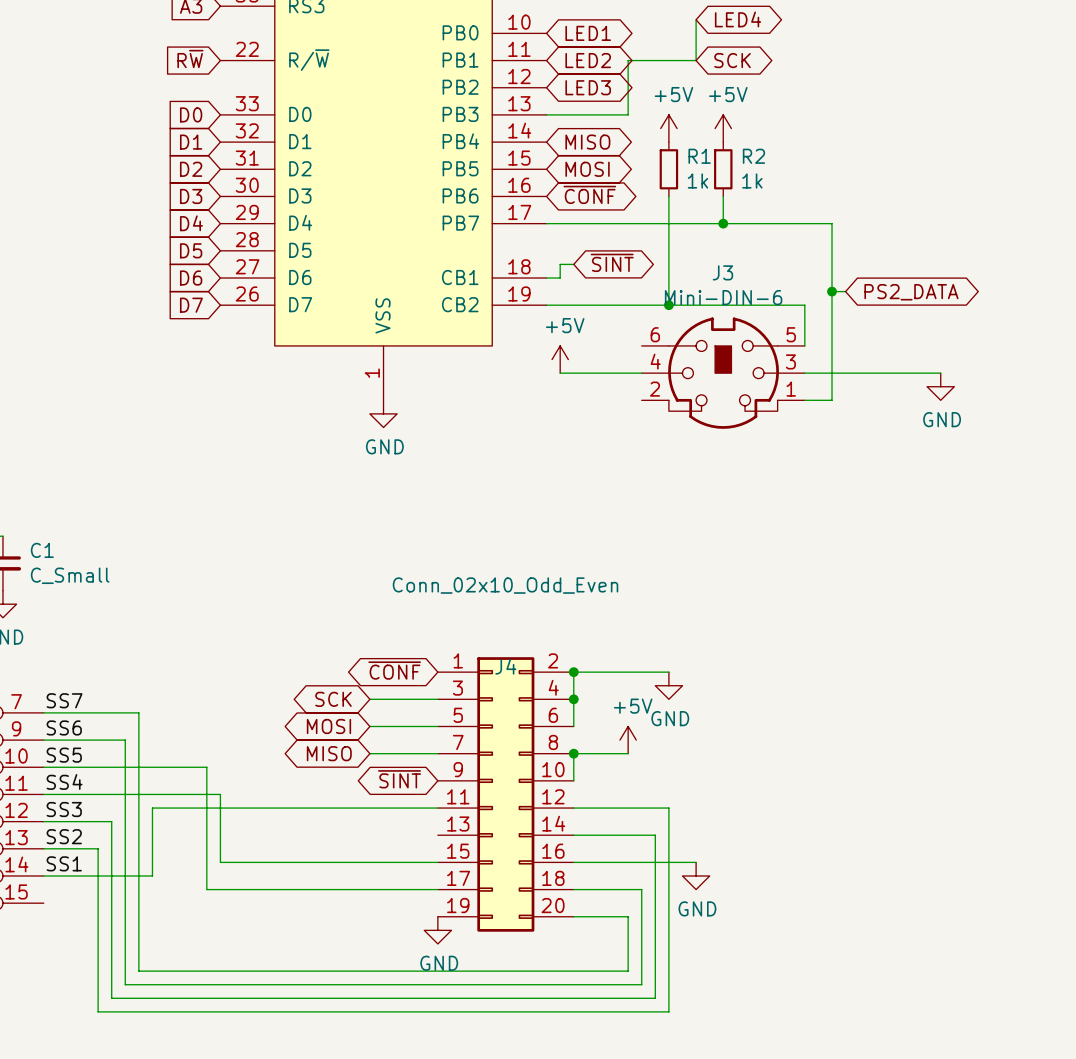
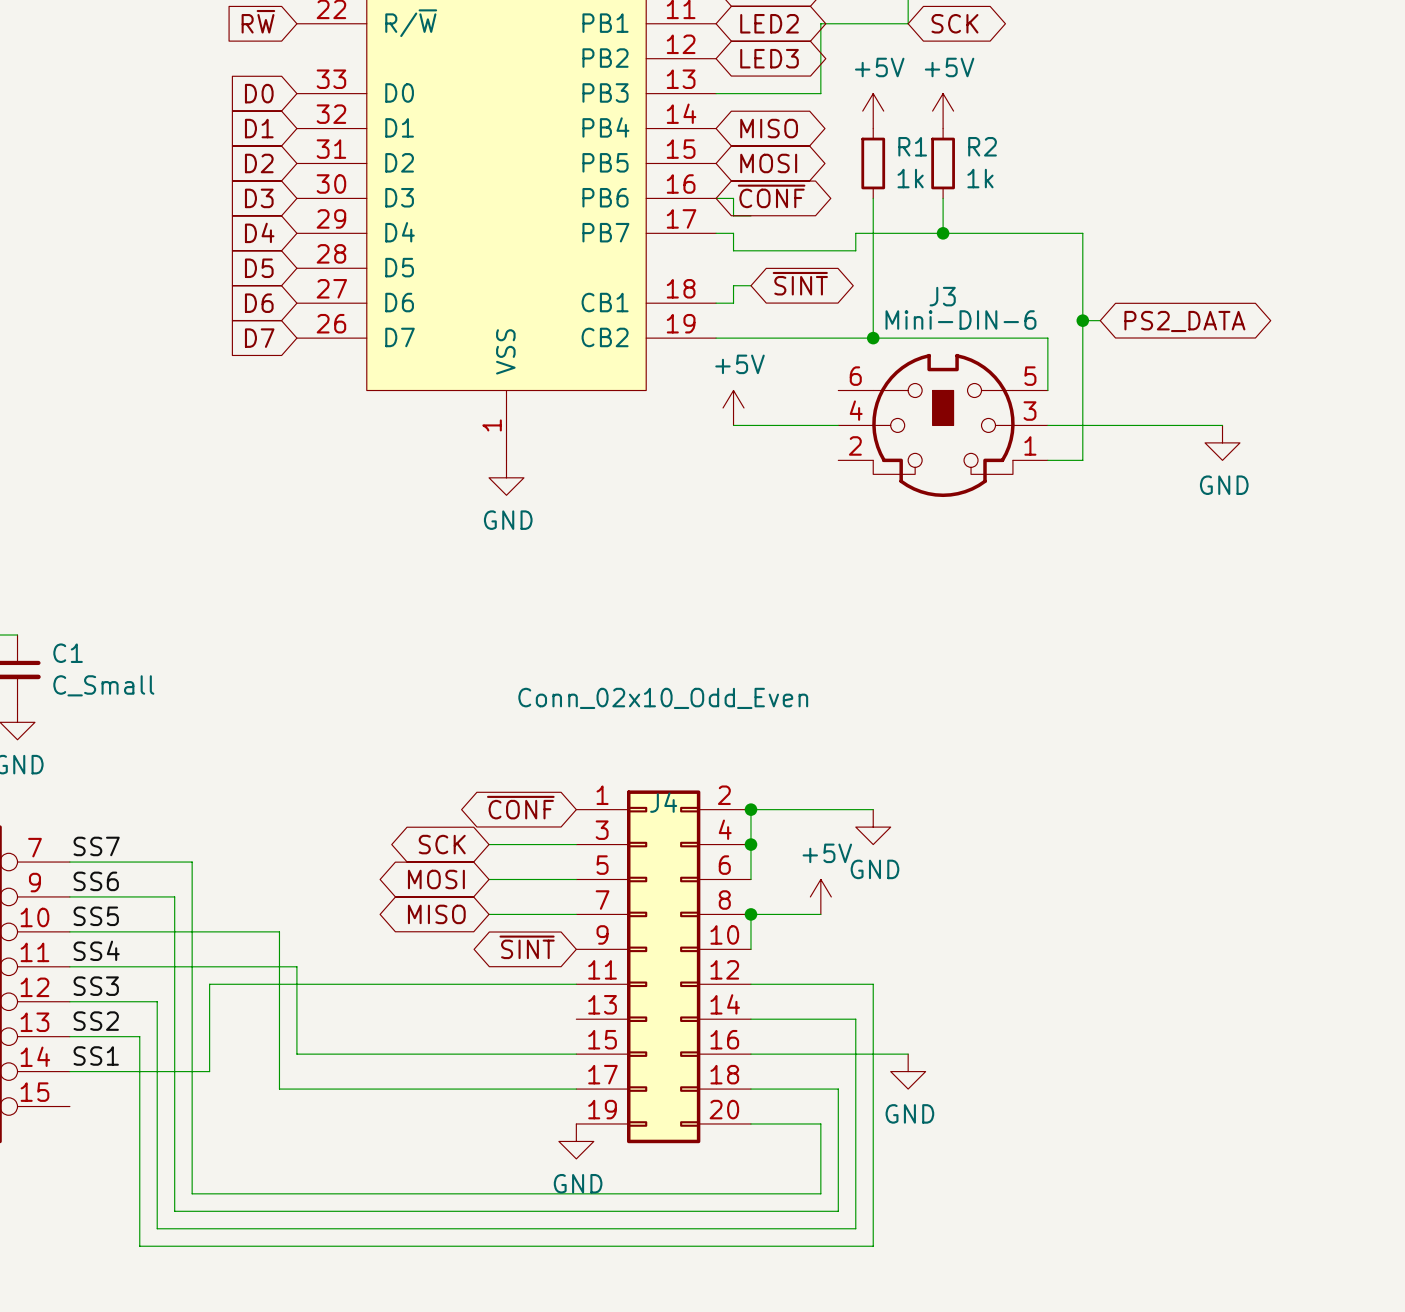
wire: none -> (716, 198) (733, 198) (733, 215) (750, 215)
wire: (560, 223) (655, 223) -> (733, 233) (733, 250) (855, 250) (855, 233)
J3 value position: Mini-DIN-6 (723, 297) -> Mini-DIN-6 (960, 320)

